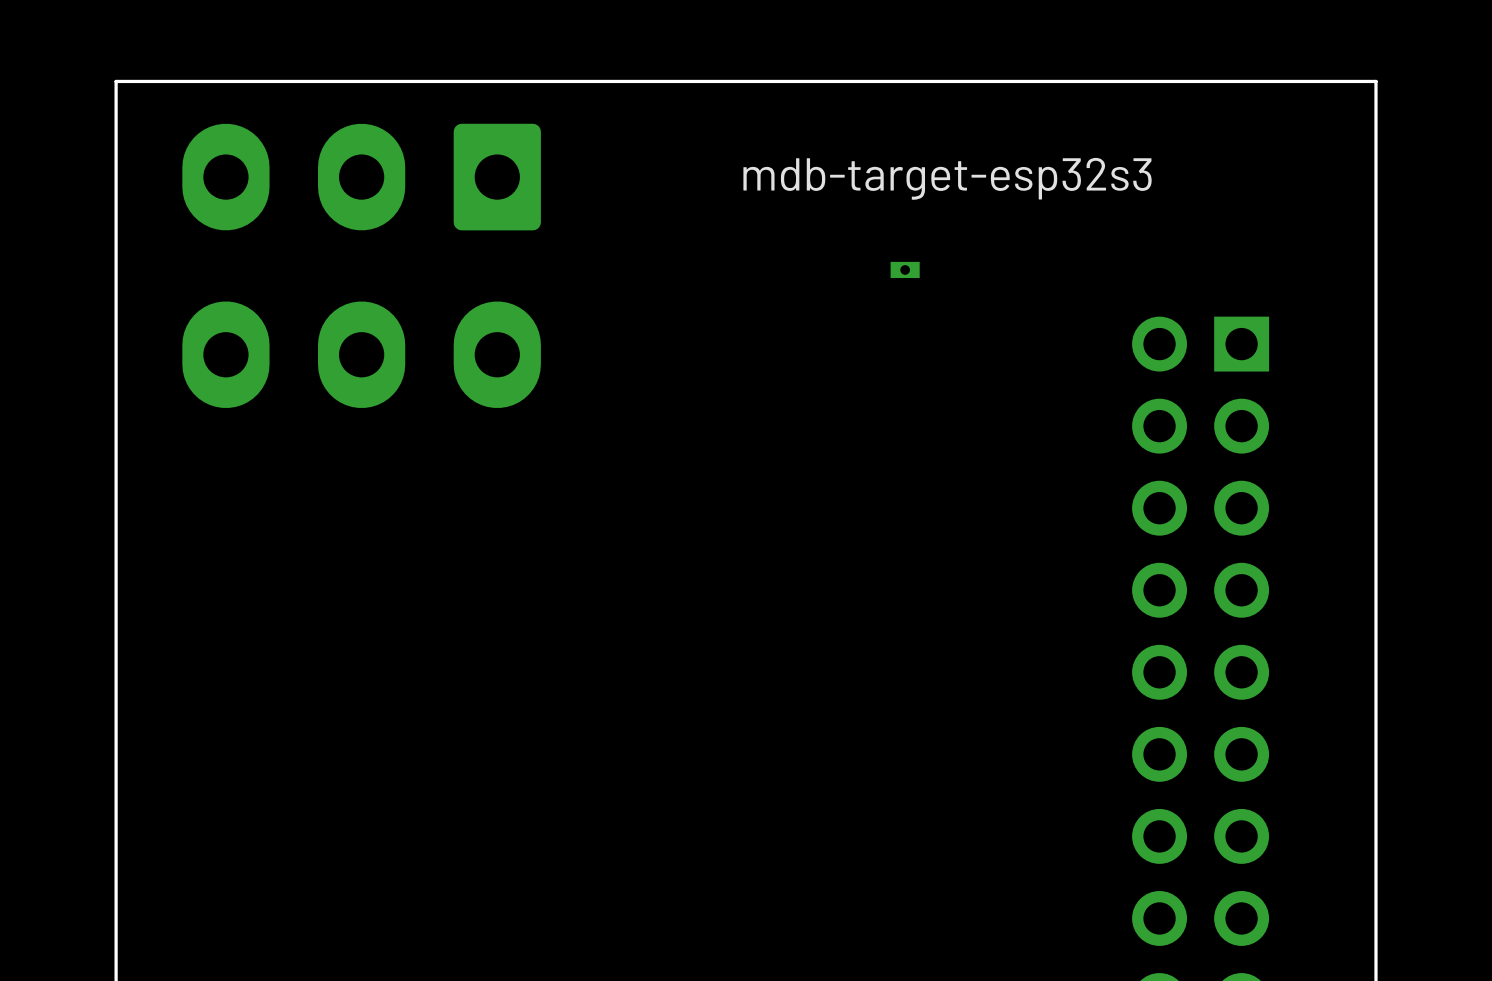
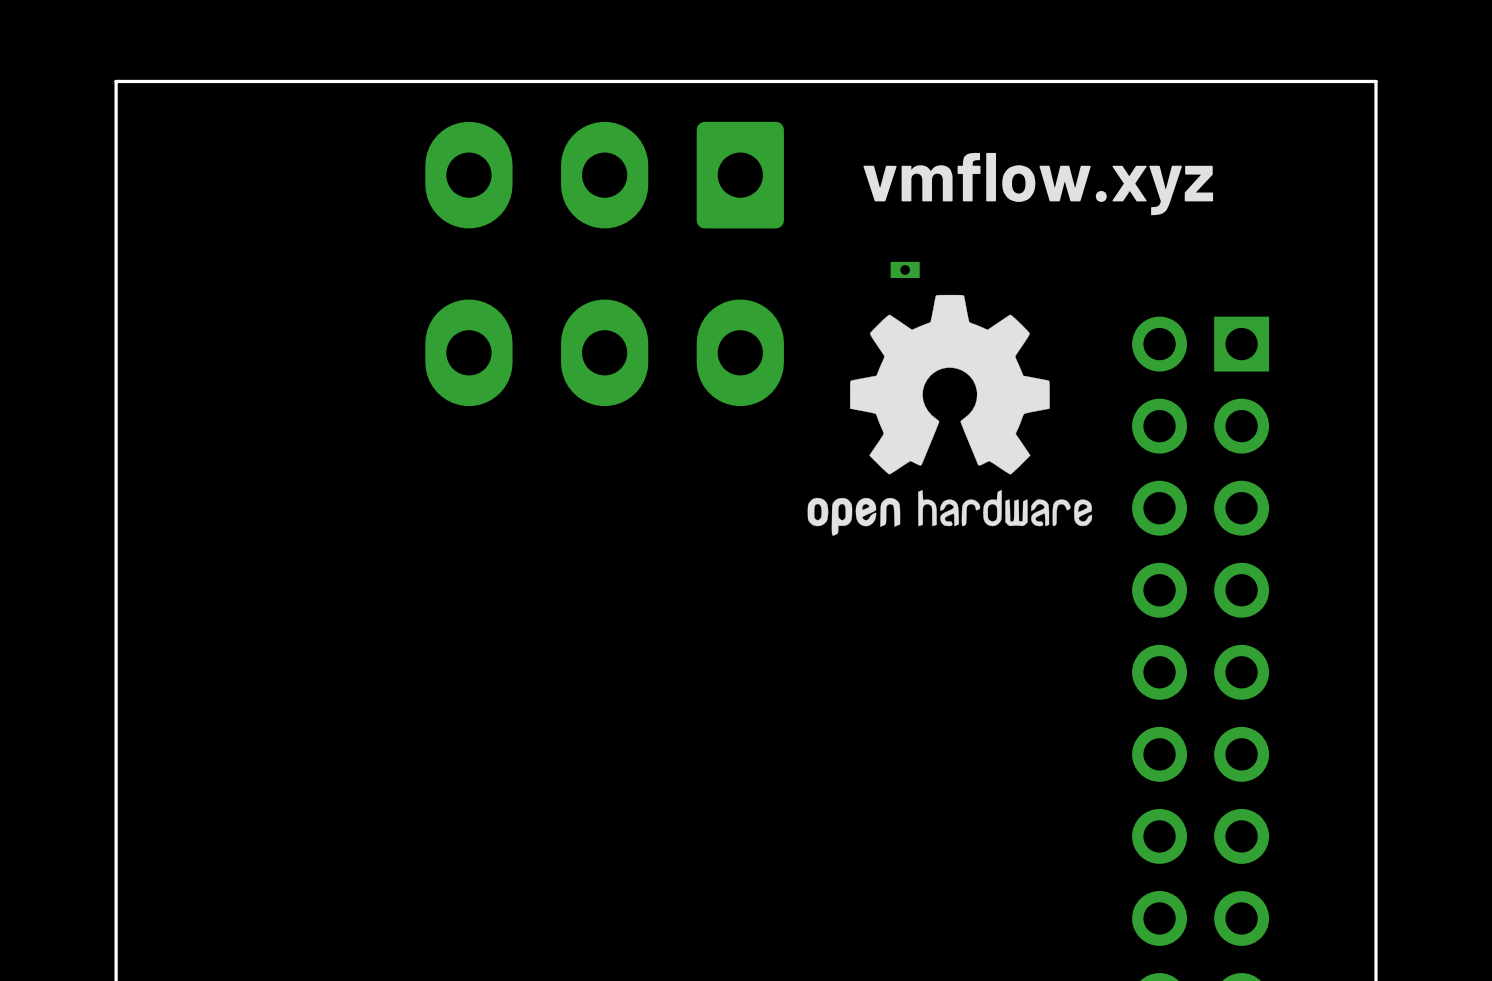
text: mdb-target-esp32s3 (947, 178) -> none
text: none -> vmflow.xyz (1038, 183)
part position: (361, 265) -> (604, 263)
drawing: none -> [807, 294, 1093, 536]

